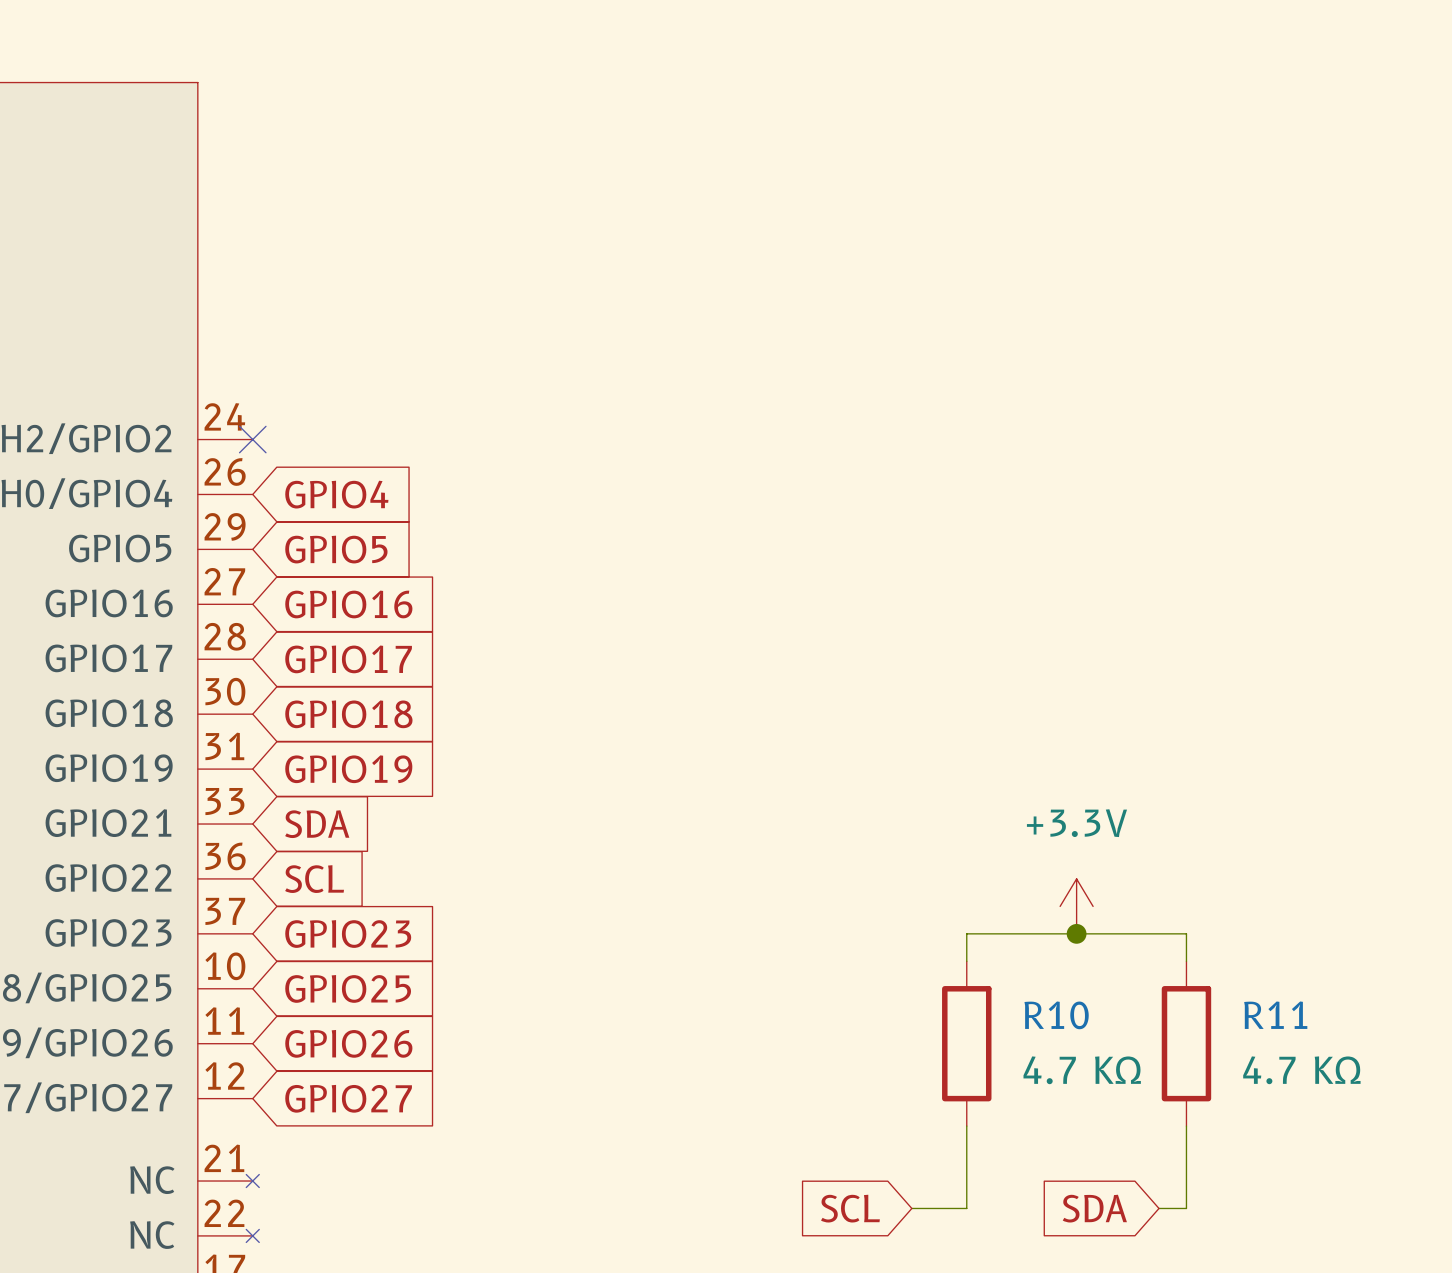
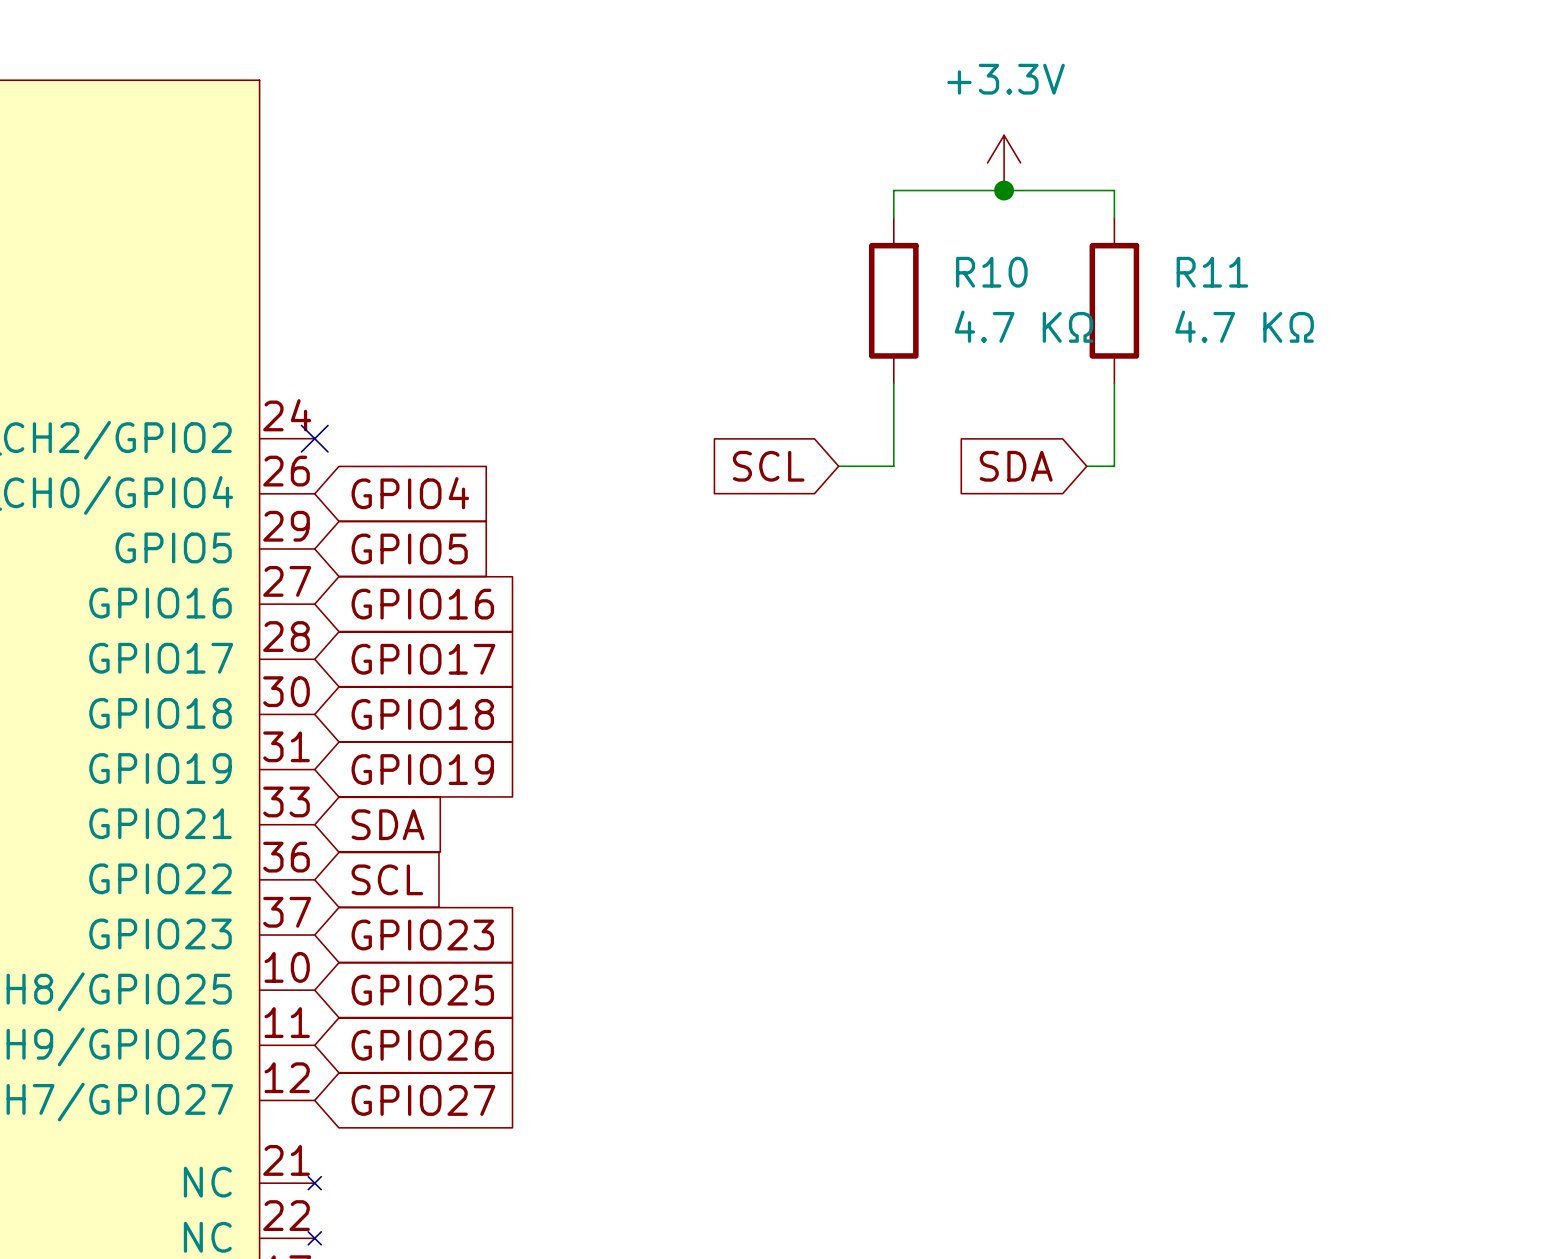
power symbol: none -> +3.3V (1004, 162)
junction: none -> (1004, 190)
wire: none -> (893, 218) (893, 190) (1114, 190) (1114, 218)
wire: none -> (893, 383) (893, 466) (838, 466)
wire: none -> (1114, 383) (1114, 466) (1086, 466)
global label: none -> SCL (768, 466)
global label: none -> SDA (1016, 466)
power symbol: +3.3V (1076, 906) -> none
junction: (1076, 933) -> none
wire: (966, 961) (966, 933) (1186, 933) (1186, 961) -> none
R10 position: (966, 1043) -> (893, 300)
R11 position: (1186, 1043) -> (1114, 300)
wire: (966, 1126) (966, 1208) (911, 1208) -> none
wire: (1186, 1126) (1186, 1208) (1158, 1208) -> none
global label: SCL (850, 1208) -> none
global label: SDA (1094, 1208) -> none

